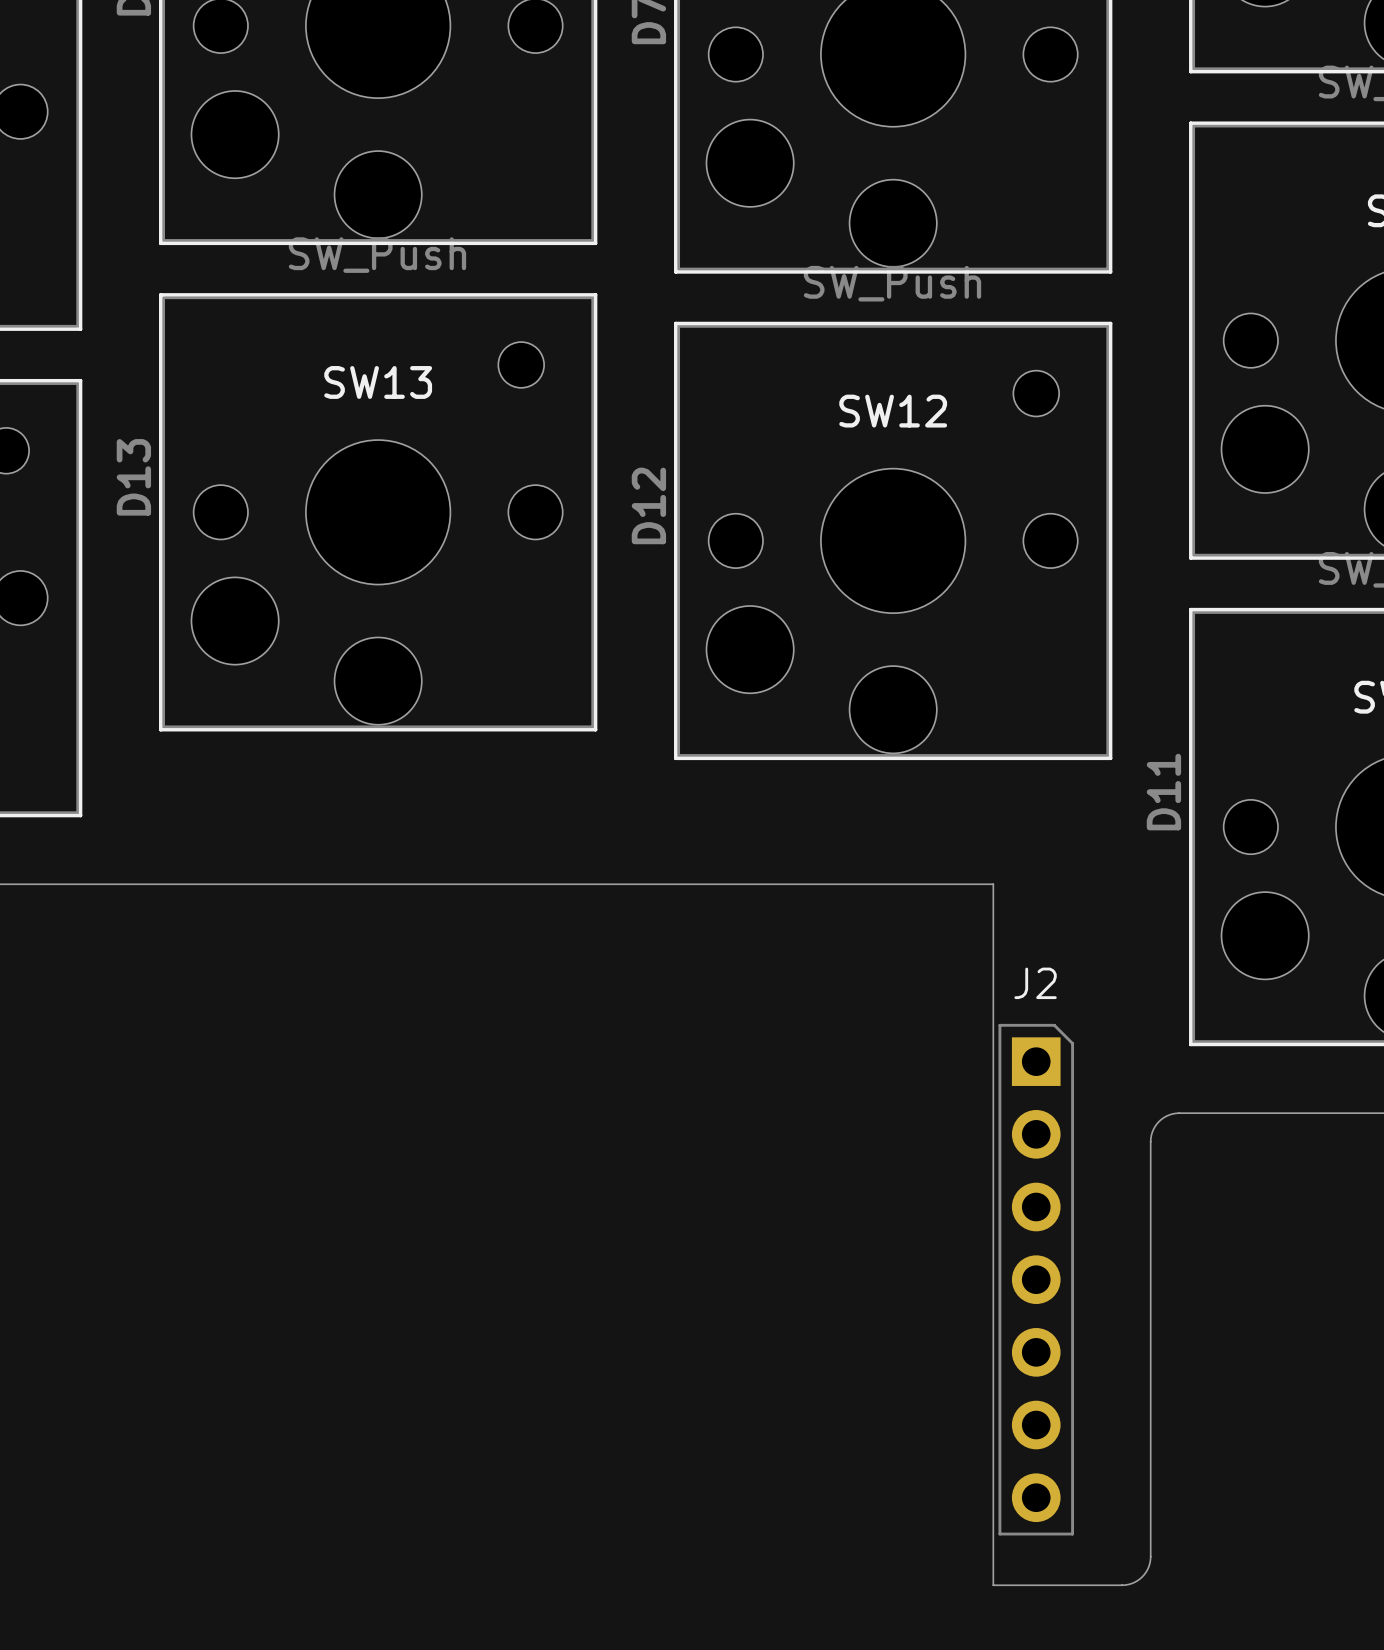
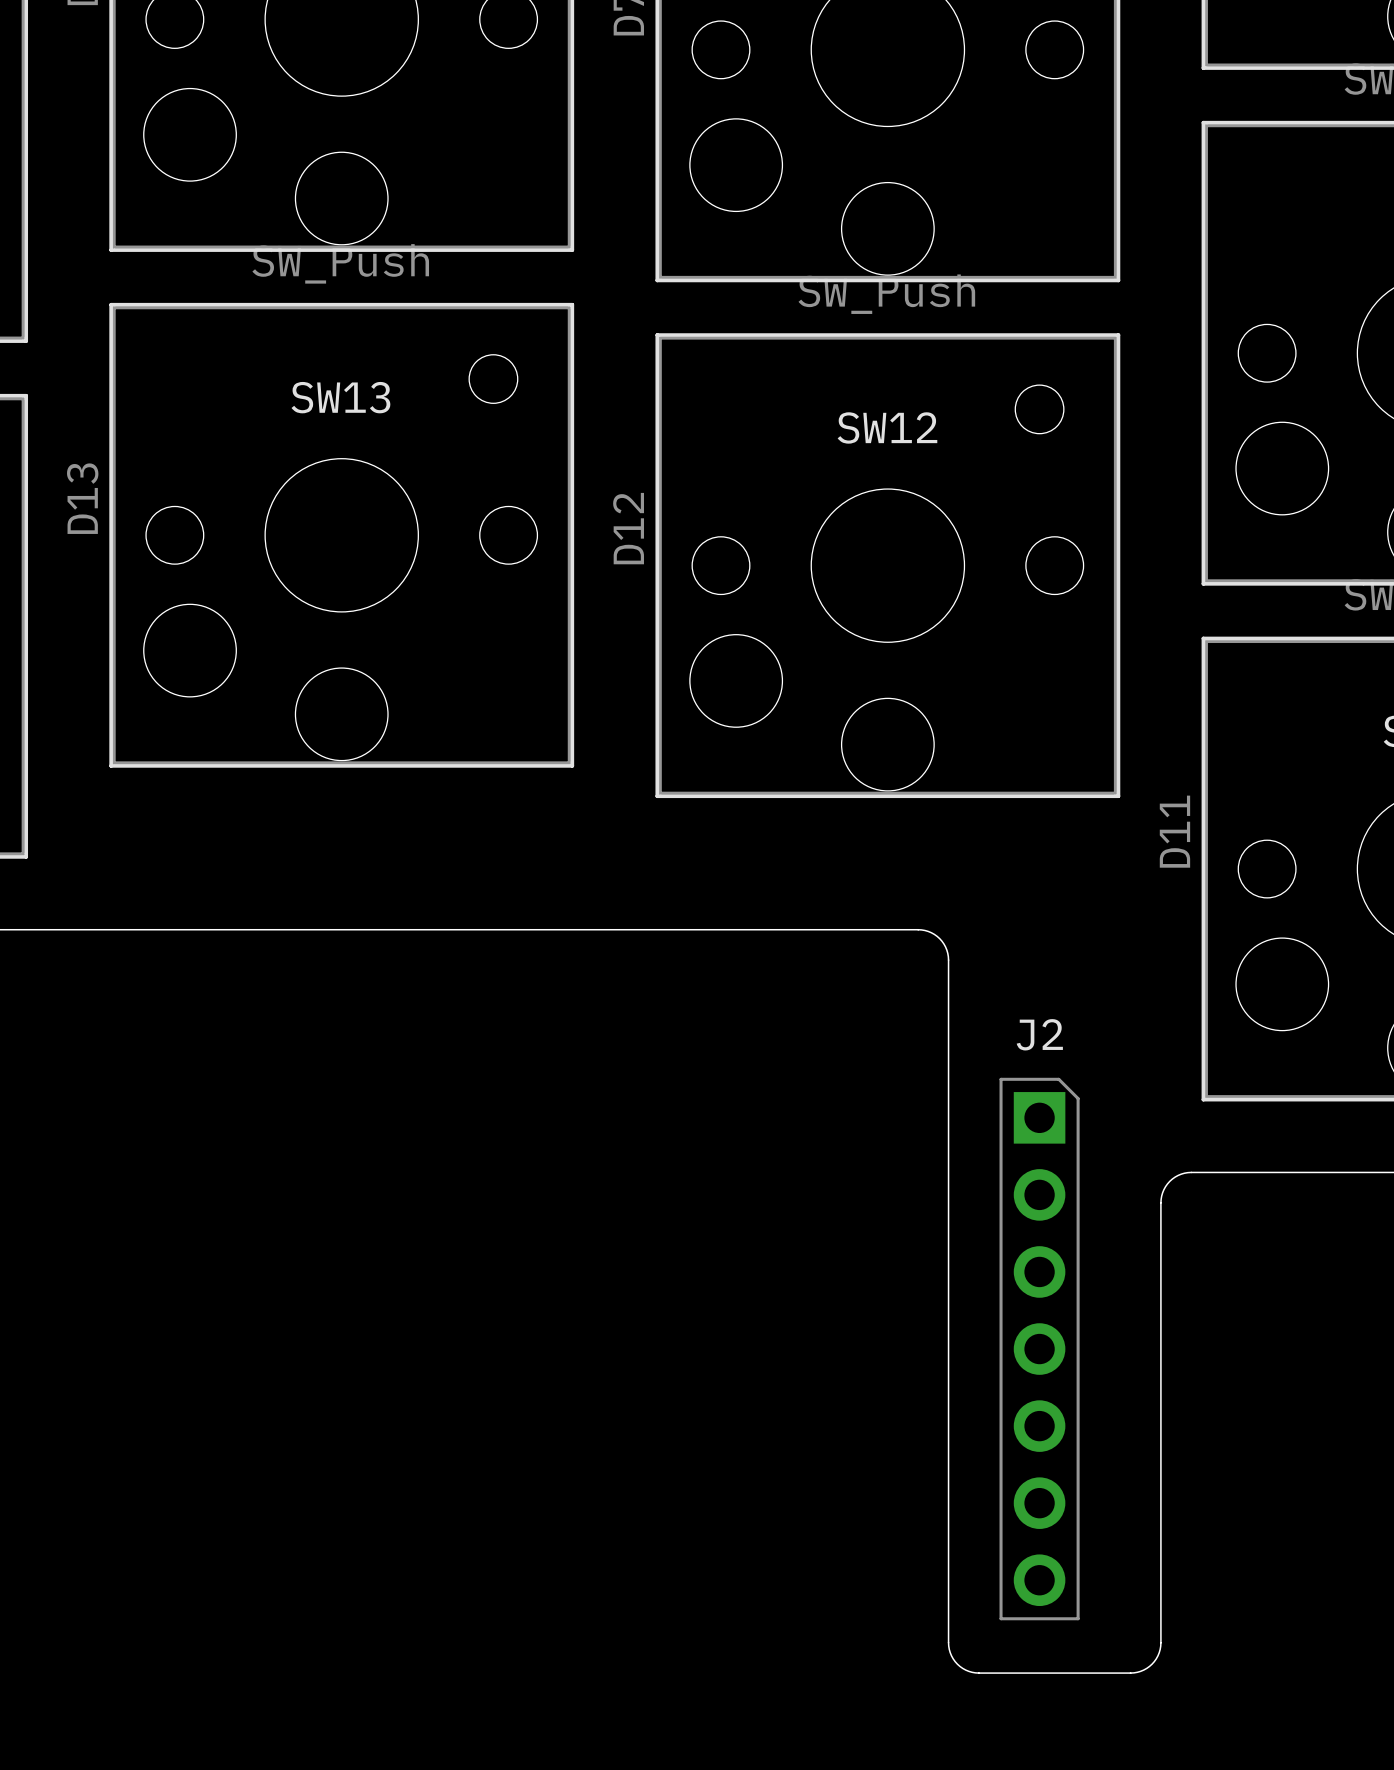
board edge: (921, 884) (993, 884) (993, 1585) -> (918, 929) (931, 932) (939, 938) (945, 946) (948, 960) (948, 1646) (953, 1658) (962, 1668) (975, 1672) (994, 1673)

